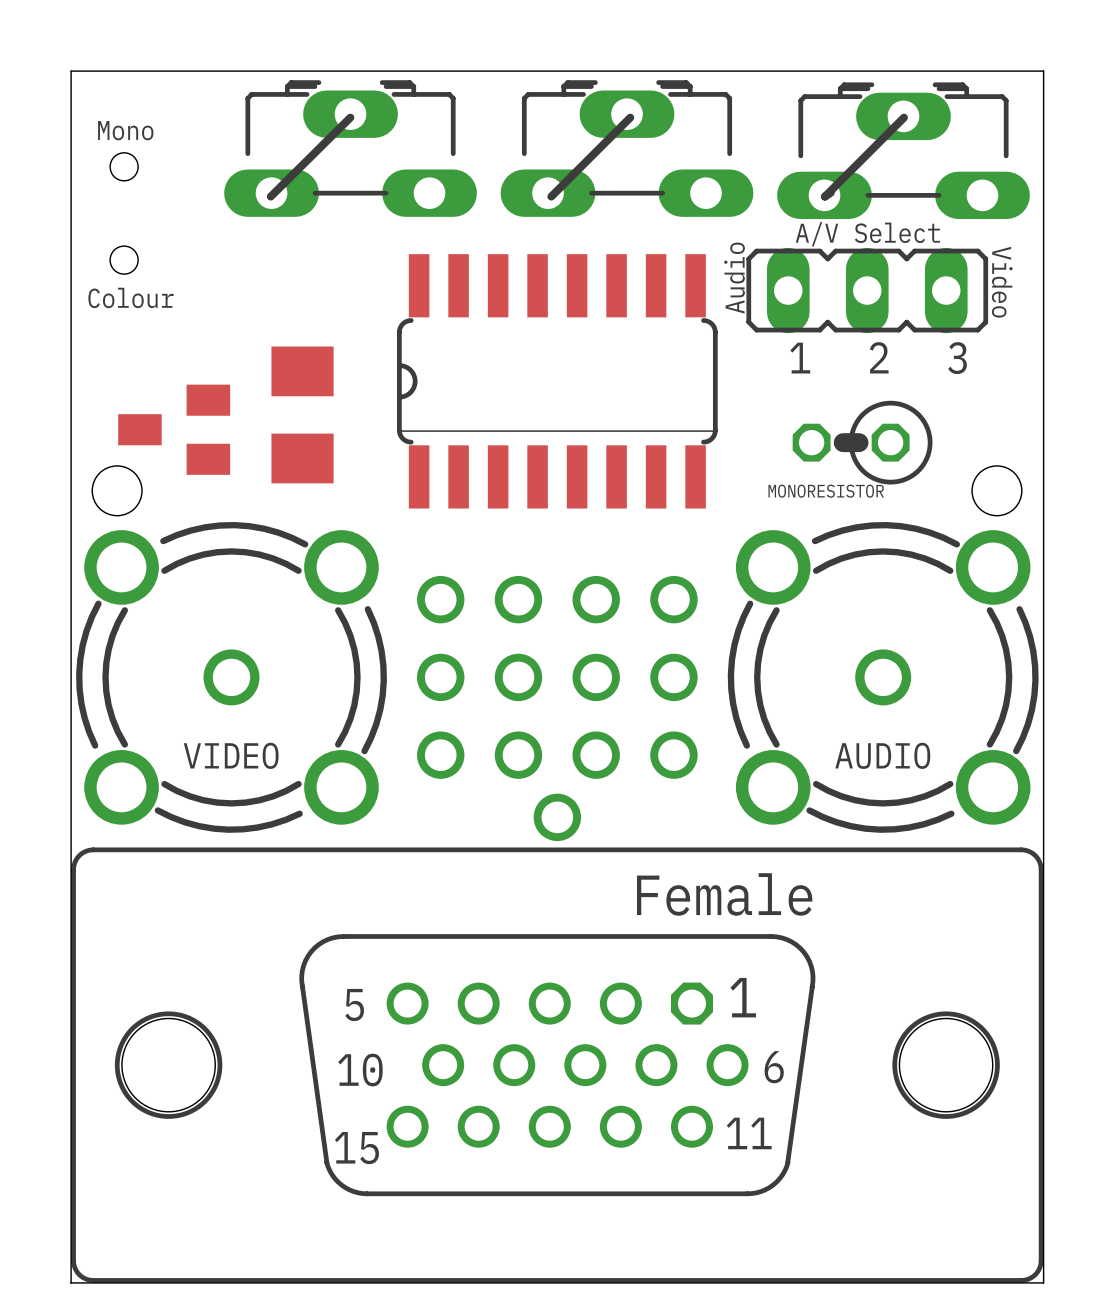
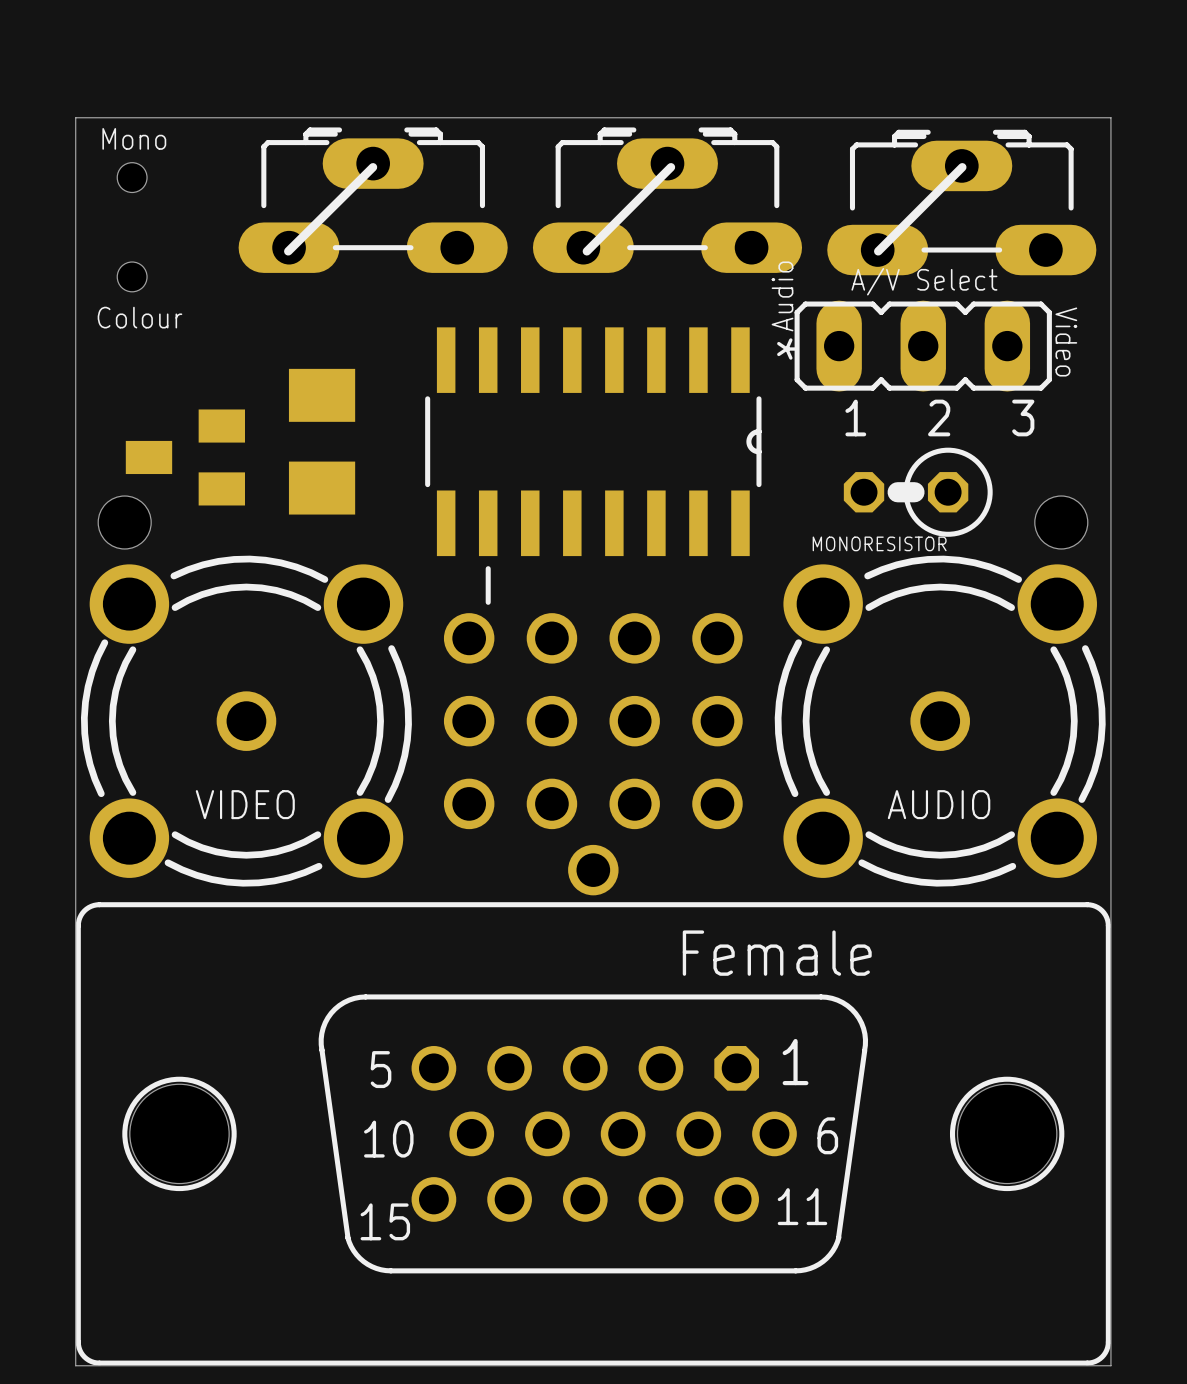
board edge: (71, 110) (71, 71) (1043, 71) (1043, 110) -> (75, 117) (1110, 117)
line: (350, 117) (270, 196) -> (373, 167) (288, 251)
line: (630, 117) (551, 196) -> (670, 167) (586, 251)
line: (903, 117) (824, 196) (830, 192) -> none
part position: (350, 148) -> (373, 200)
part position: (627, 148) -> (667, 200)
part position: (903, 150) -> (961, 202)
line: none -> (962, 167) (878, 251)
text position: A/V Select (867, 234) -> A/V Select (924, 281)
text position: Video (1002, 282) -> Video (1066, 342)
part position: (867, 290) -> (923, 346)
part: (557, 381) -> none
part: none -> (593, 466)
MONORESISTOR position: (862, 442) -> (918, 492)

